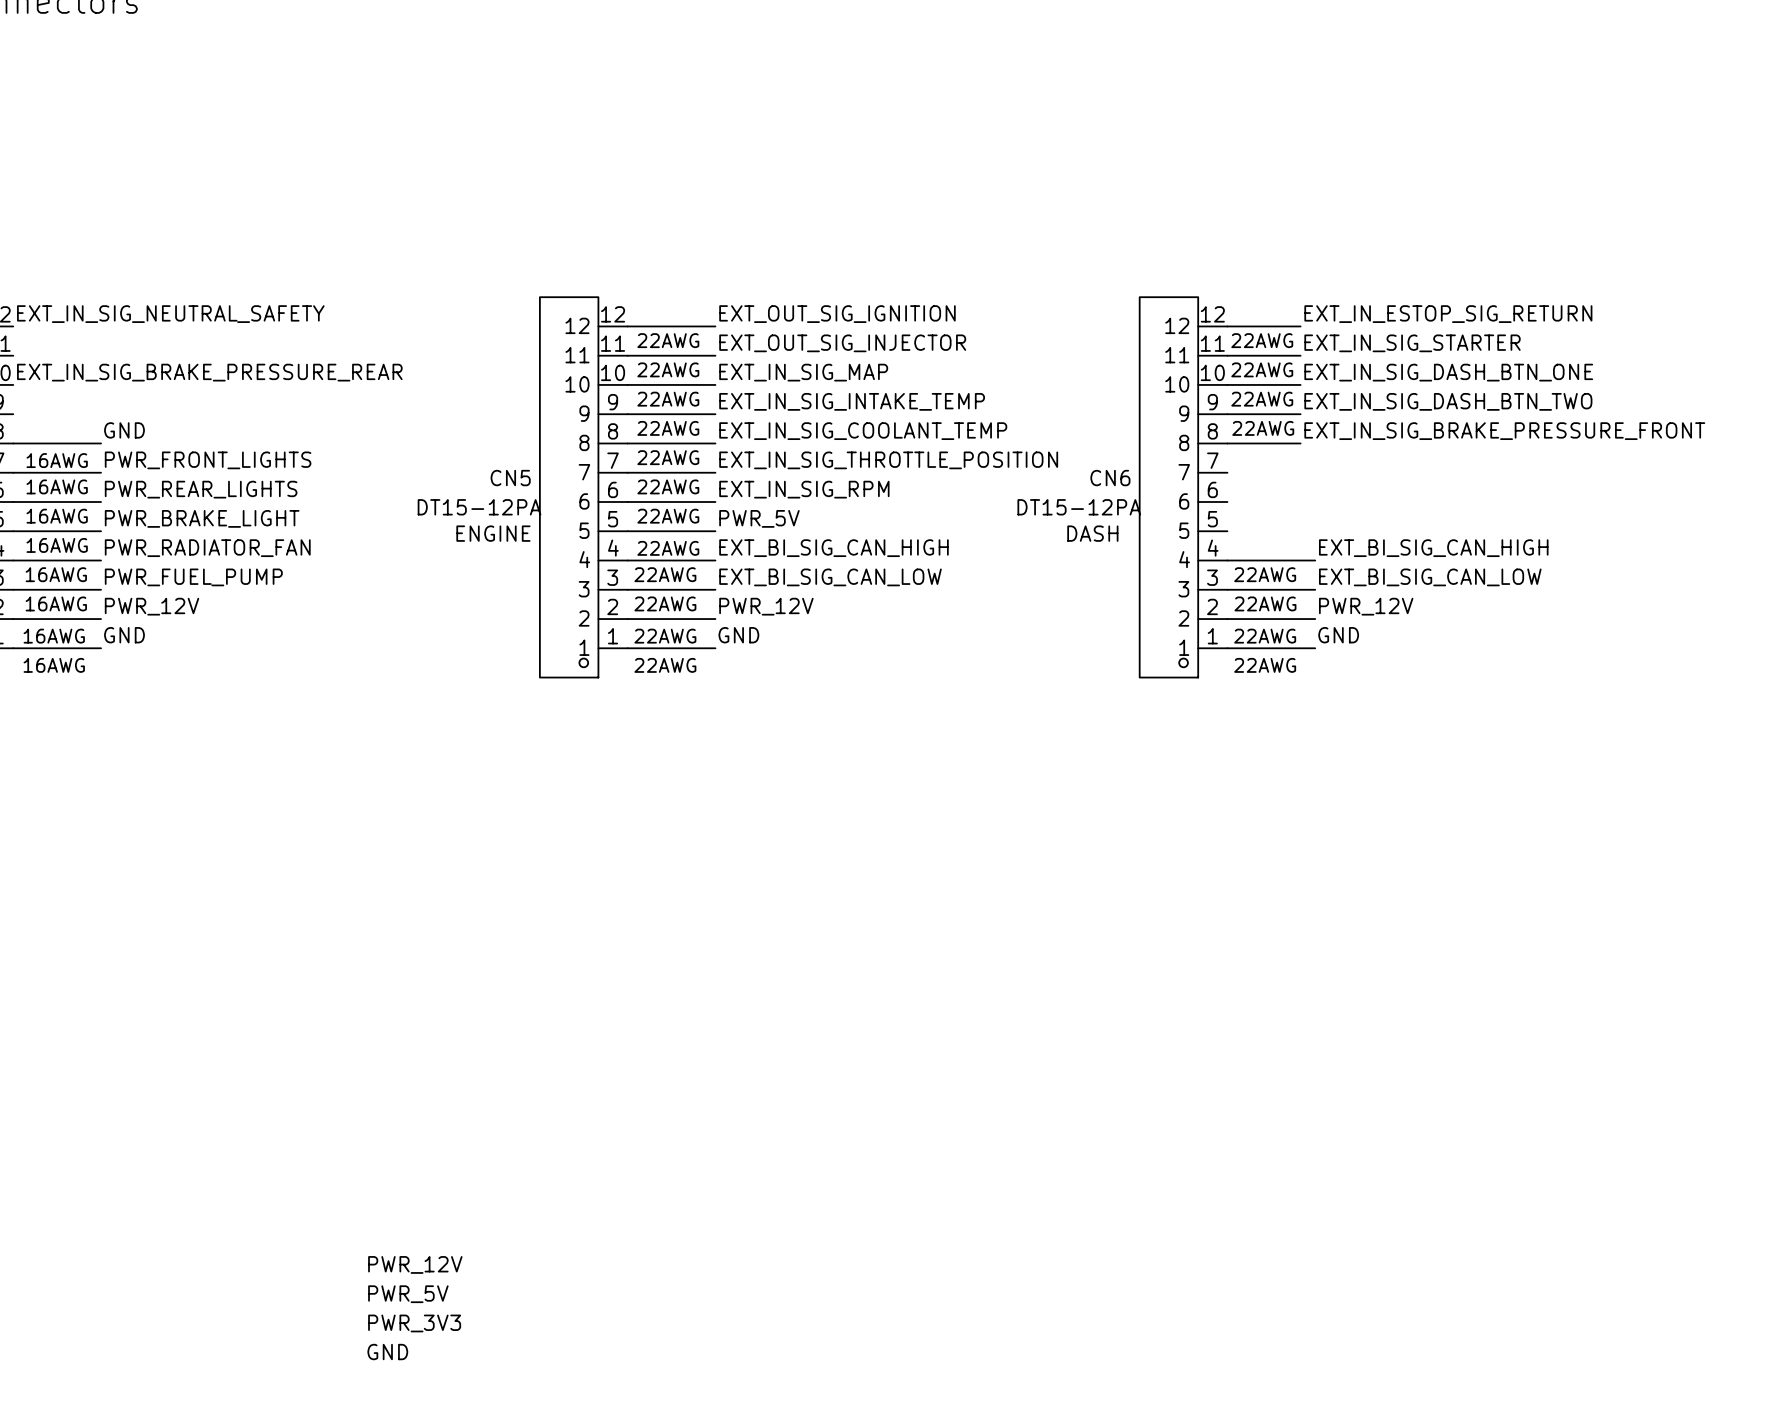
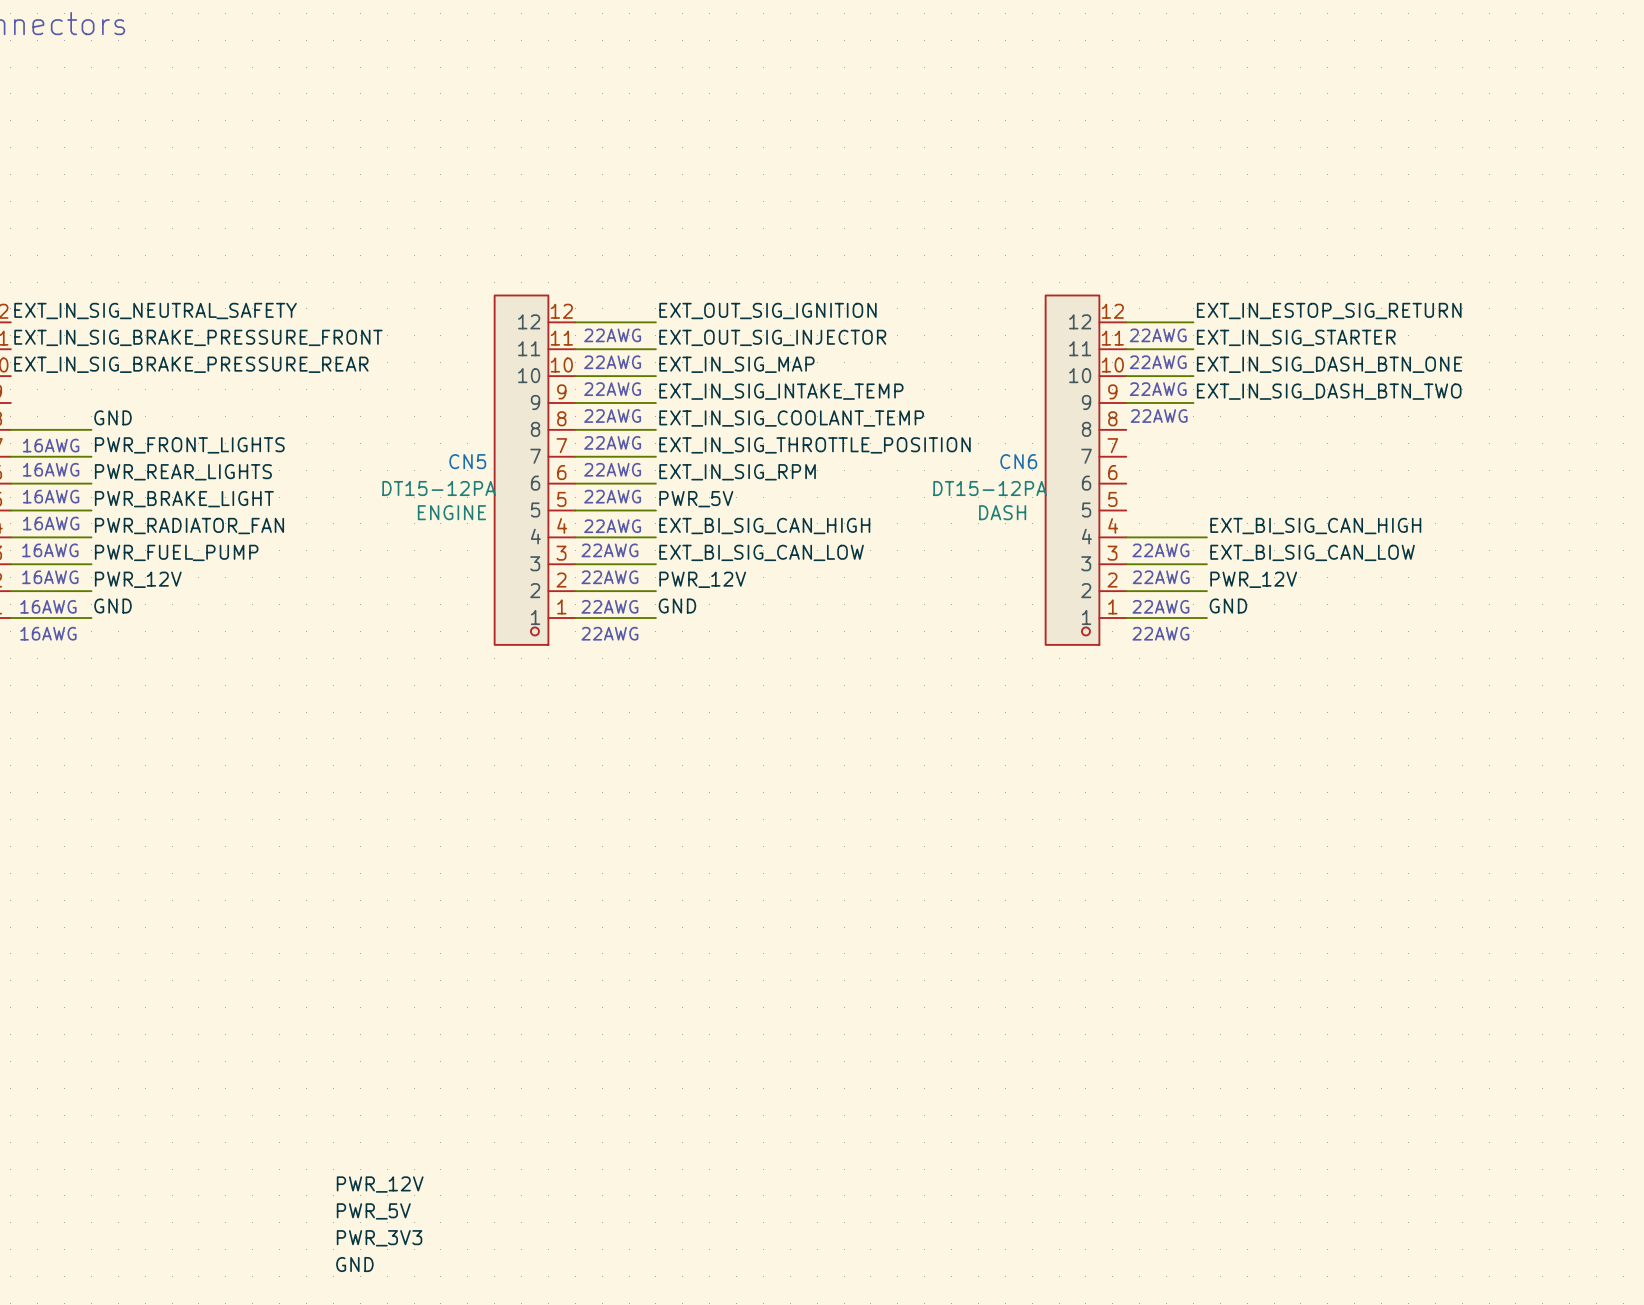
label: none -> EXT_IN_SIG_BRAKE_PRESSURE_FRONT (198, 337)
label: EXT_IN_SIG_BRAKE_PRESSURE_FRONT (1504, 431) -> none
wire: (1227, 443) (1300, 443) -> none

